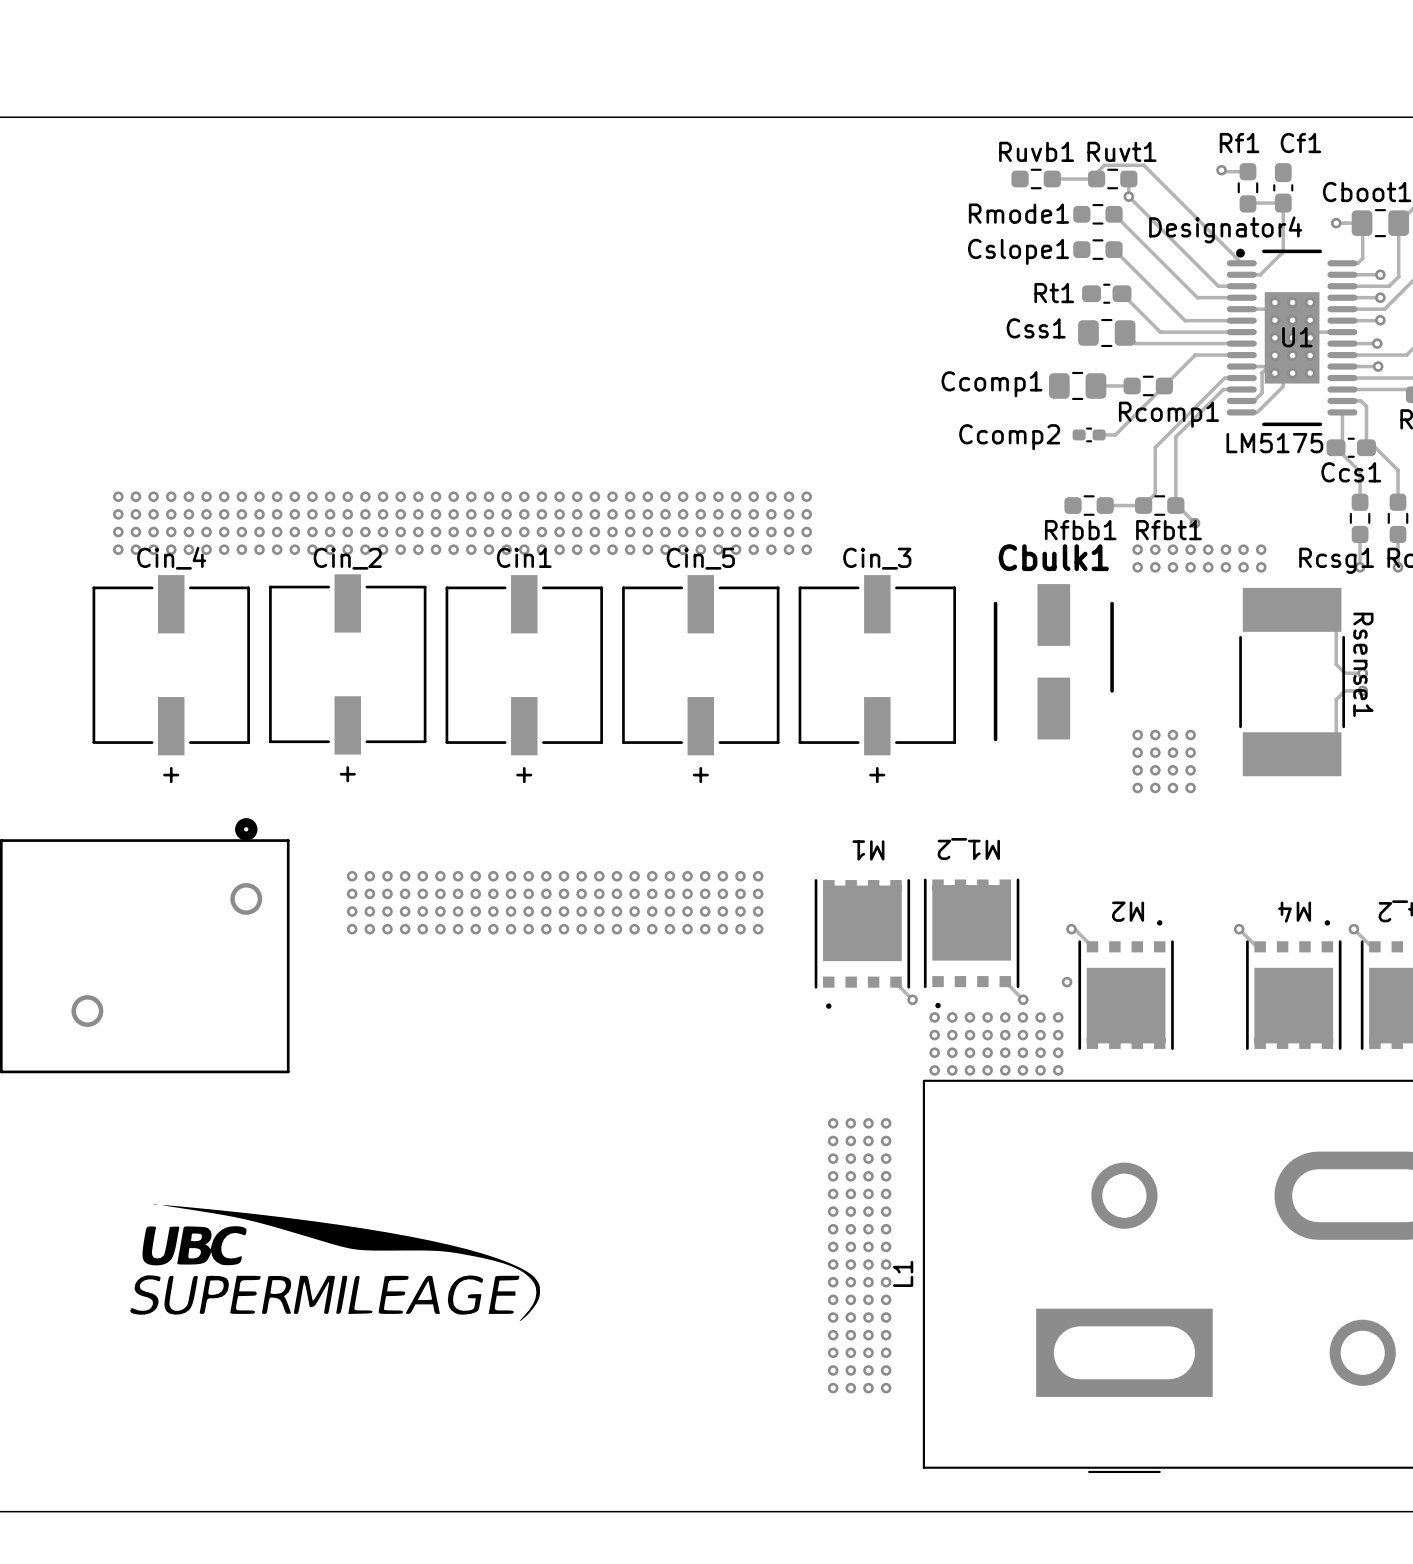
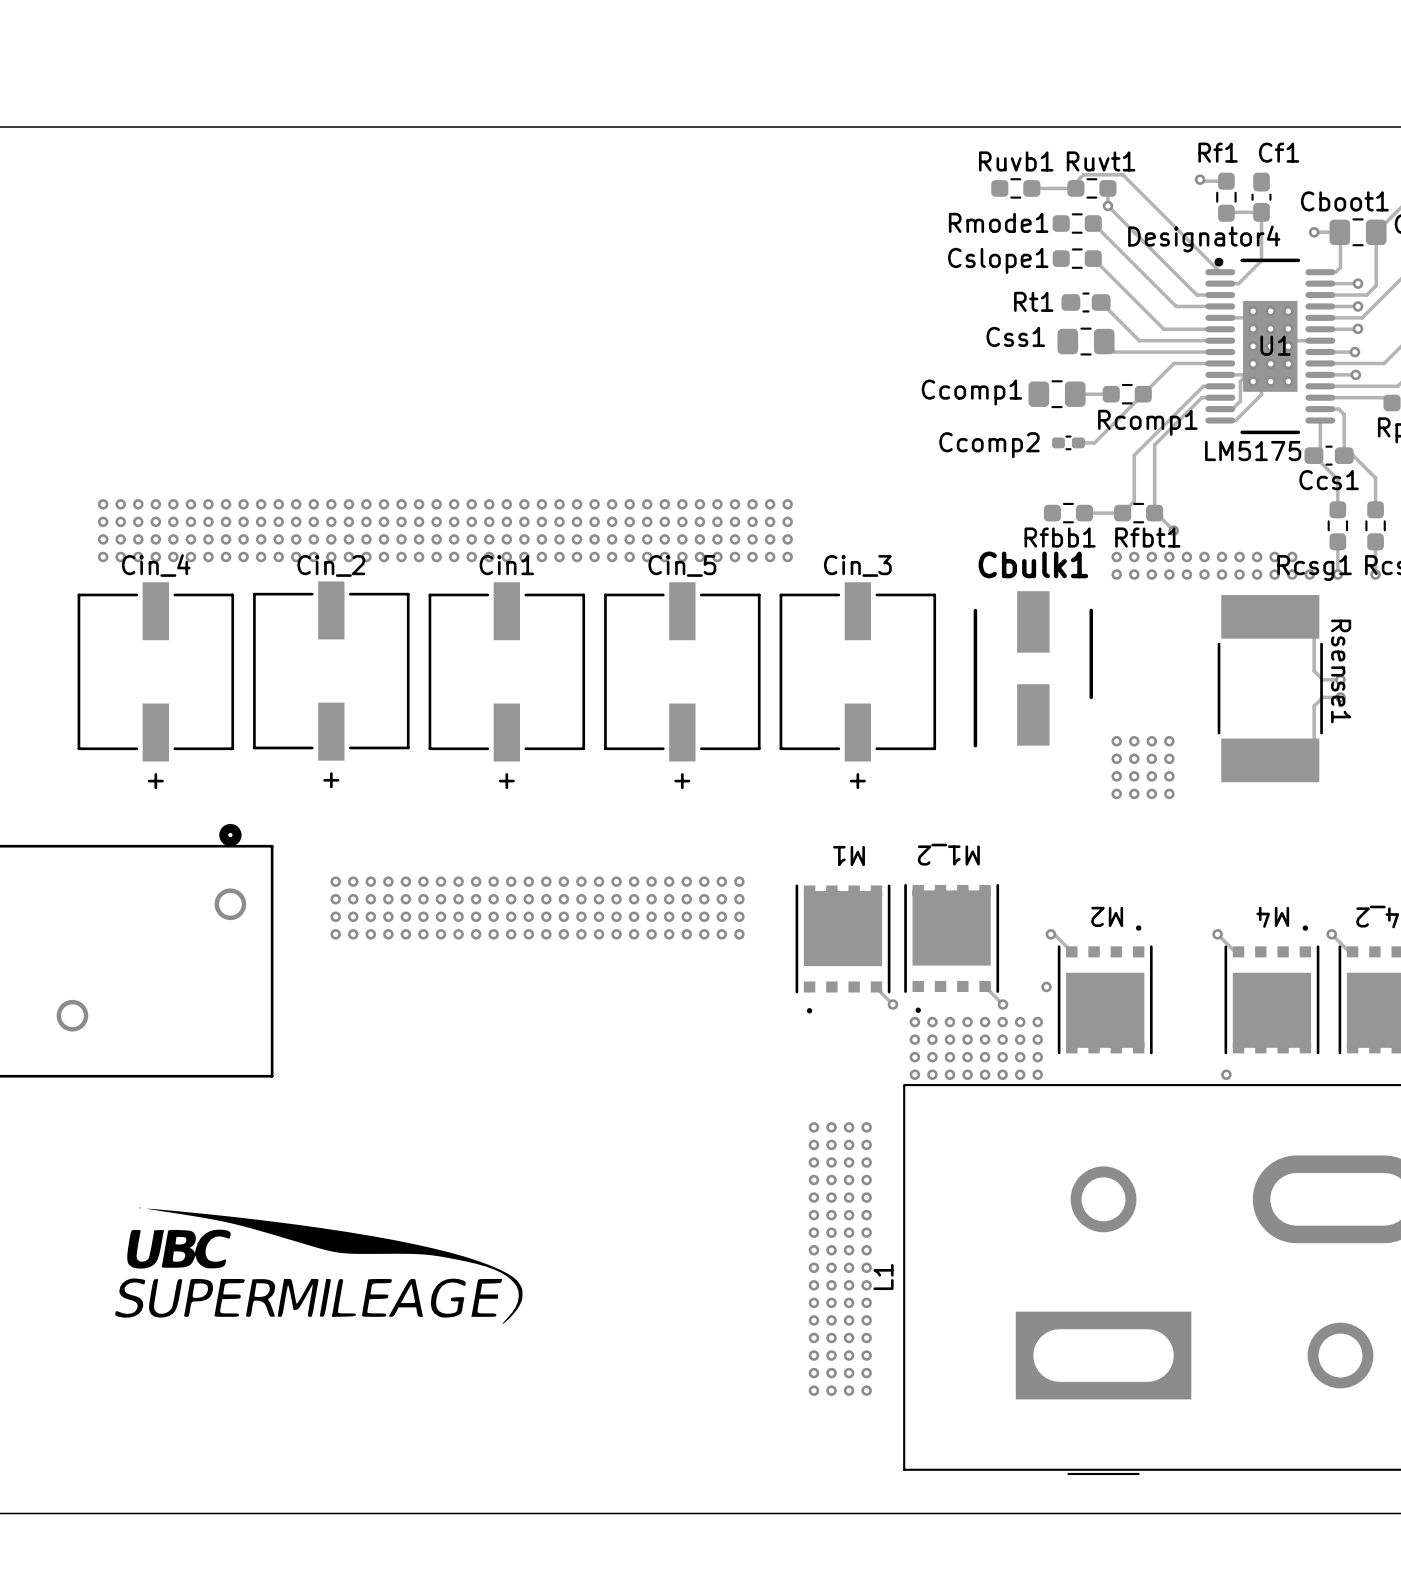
via: none -> (1257, 556)
via: none -> (1274, 556)
via: none -> (1292, 556)
via: none -> (1257, 574)
via: none -> (1274, 574)
via: none -> (1292, 574)
via: none -> (1309, 574)
via: none -> (1226, 1074)

